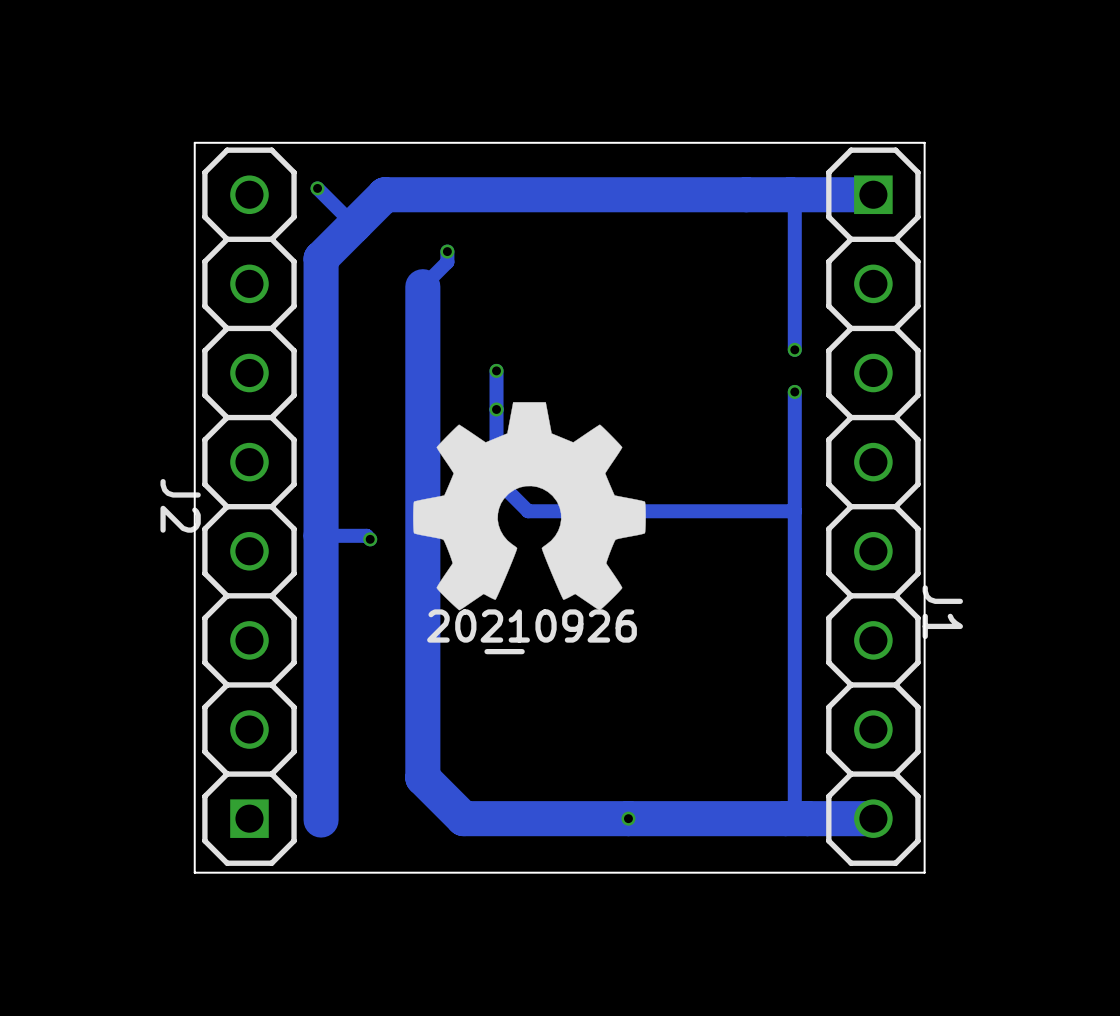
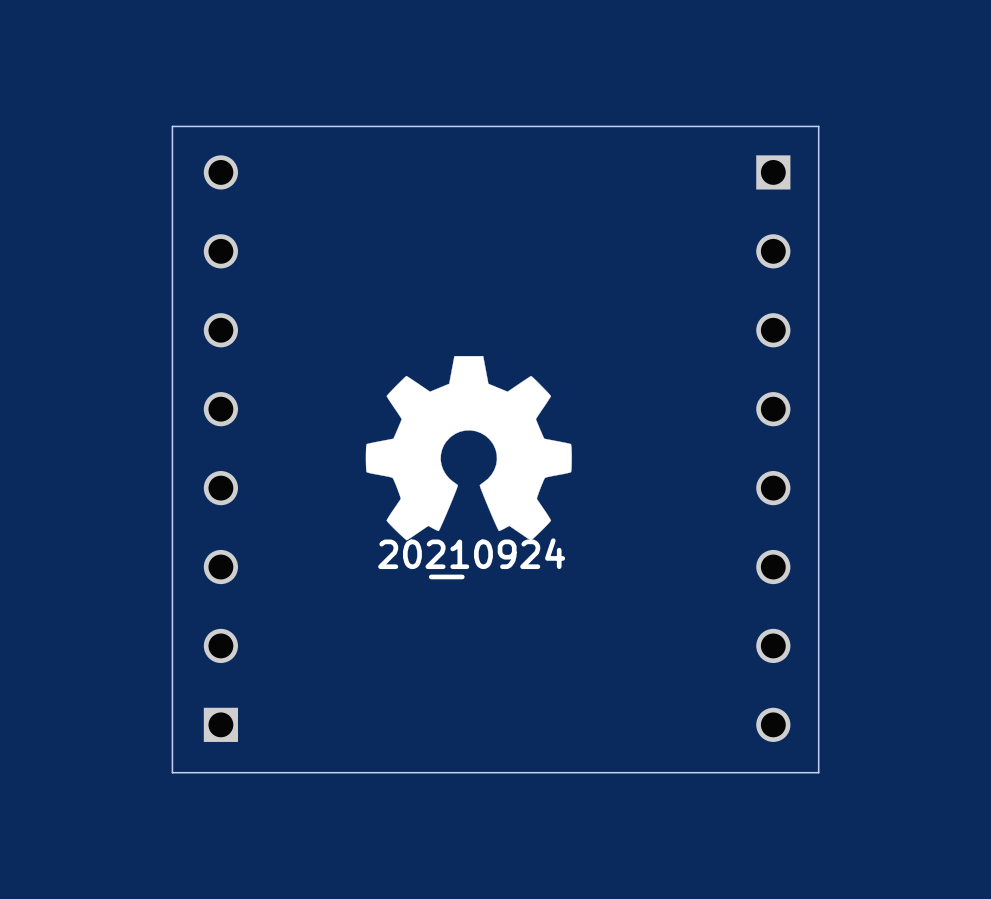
track: (317, 188) (354, 225) -> none
via: (317, 188) -> none
track: (790, 194) (794, 198) (794, 349) -> none
track: (873, 194) (384, 194) (321, 258) (321, 820) -> none
track: (447, 251) (447, 262) (422, 286) (422, 777) (463, 818) (873, 818) -> none
via: (447, 251) -> none
via: (794, 349) -> none
track: (496, 370) (496, 479) (528, 511) (794, 511) -> none
via: (496, 370) -> none
track: (794, 391) (794, 809) (785, 818) -> none
via: (794, 391) -> none
via: (496, 409) -> none
J2 side: bottom (249, 506) -> top (220, 448)
J1 side: bottom (873, 506) -> top (773, 448)
track: (321, 535) (366, 535) (370, 539) -> none
via: (370, 539) -> none
drawing shape: [427, 609, 637, 655] -> [378, 538, 566, 580]
via: (628, 818) -> none

